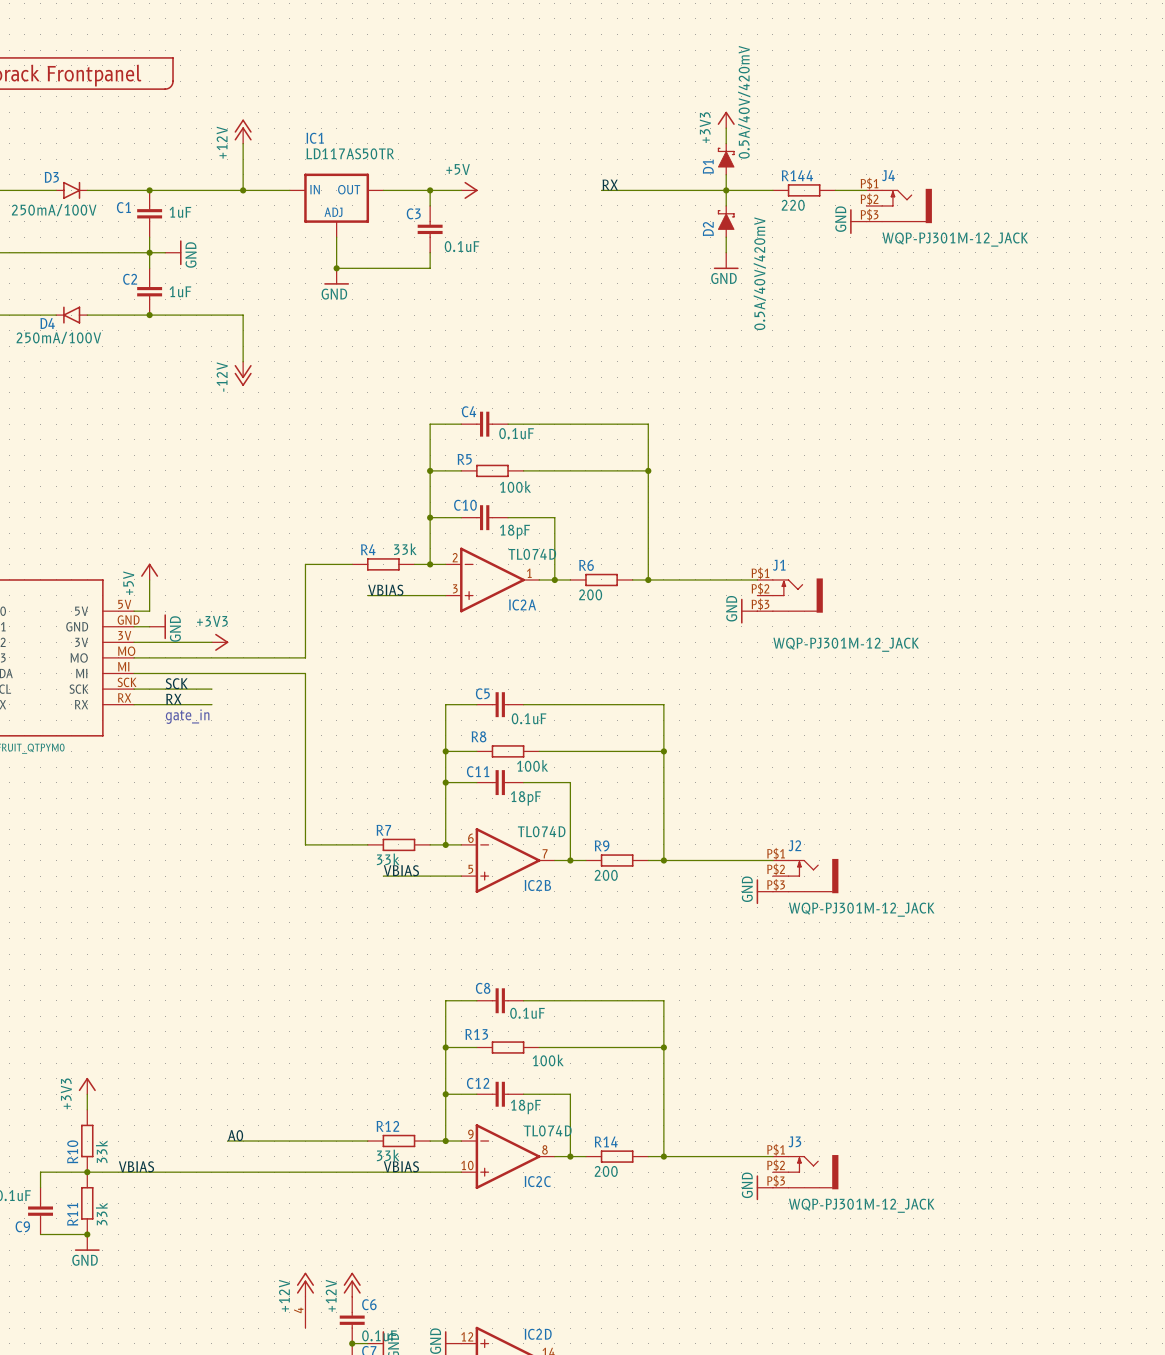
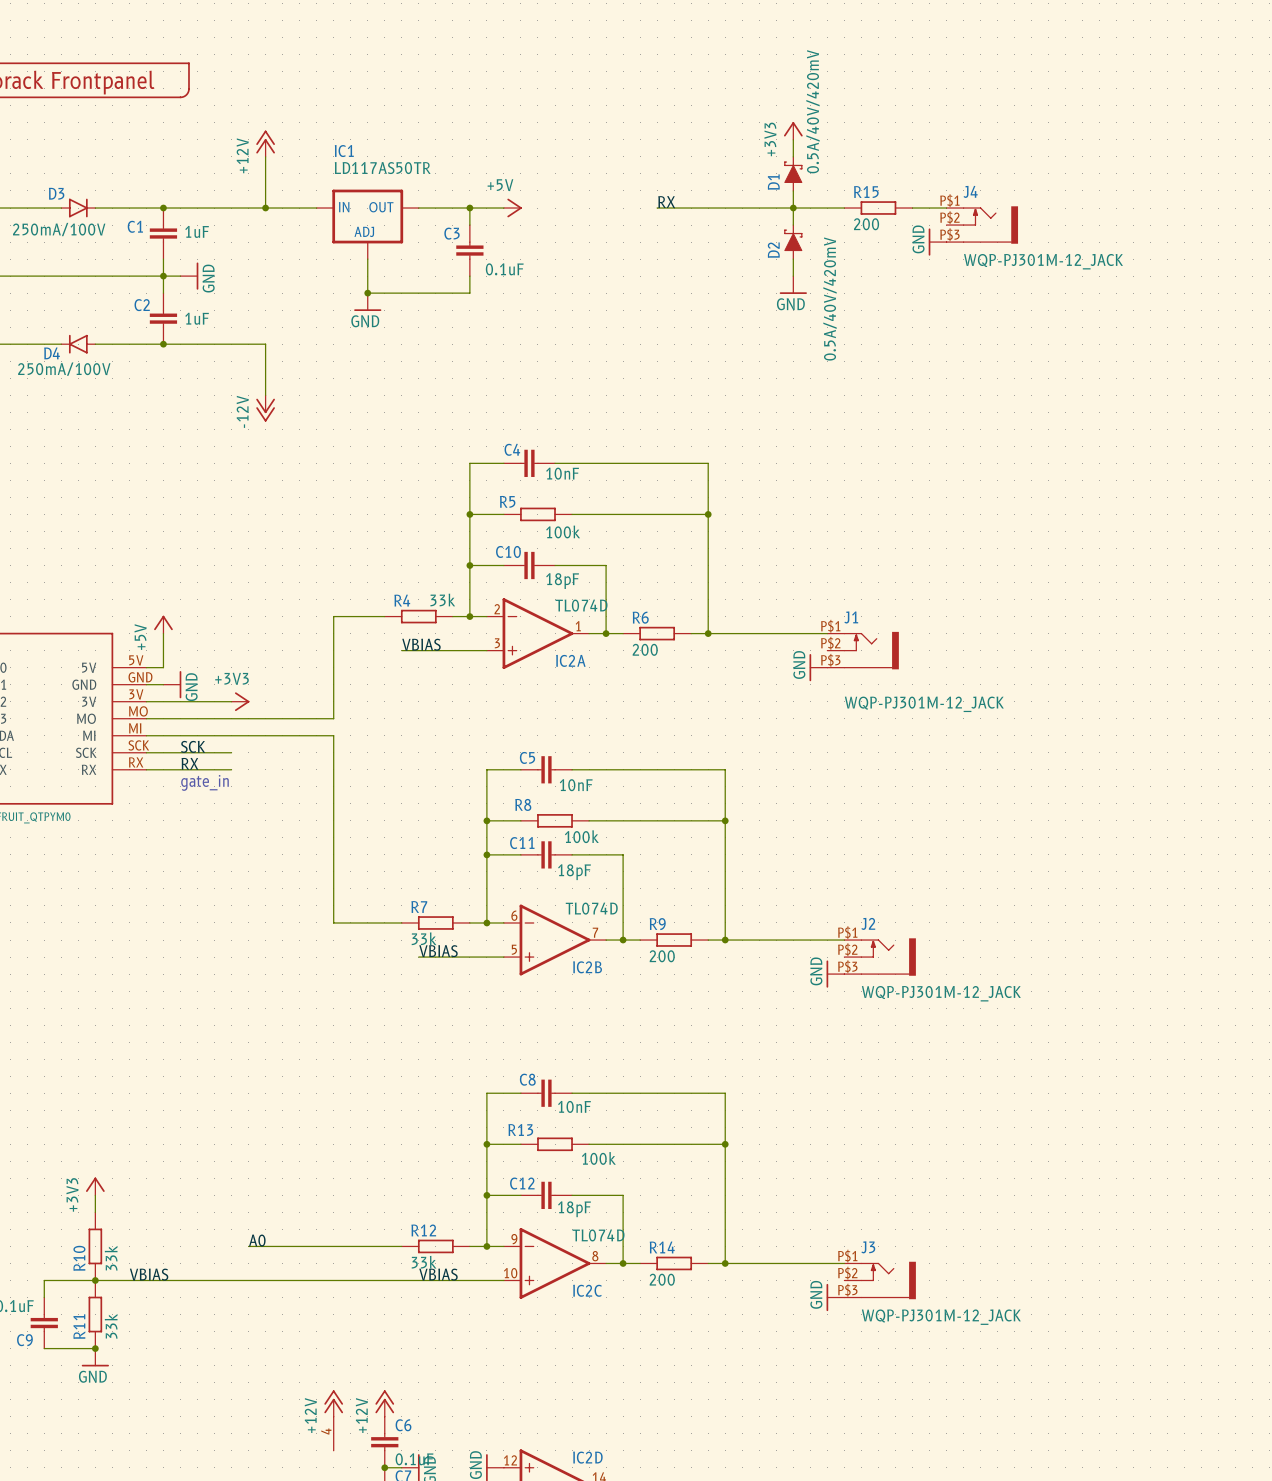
R144 name: R144 (797, 175) -> R15 (866, 192)
R144 value: 220 (793, 205) -> 200 (866, 224)
C4 value: 0.1uF (516, 433) -> 10nF (562, 473)
C5 value: 0.1uF (529, 718) -> 10nF (576, 785)
C8 value: 0.1uF (527, 1013) -> 10nF (574, 1106)

